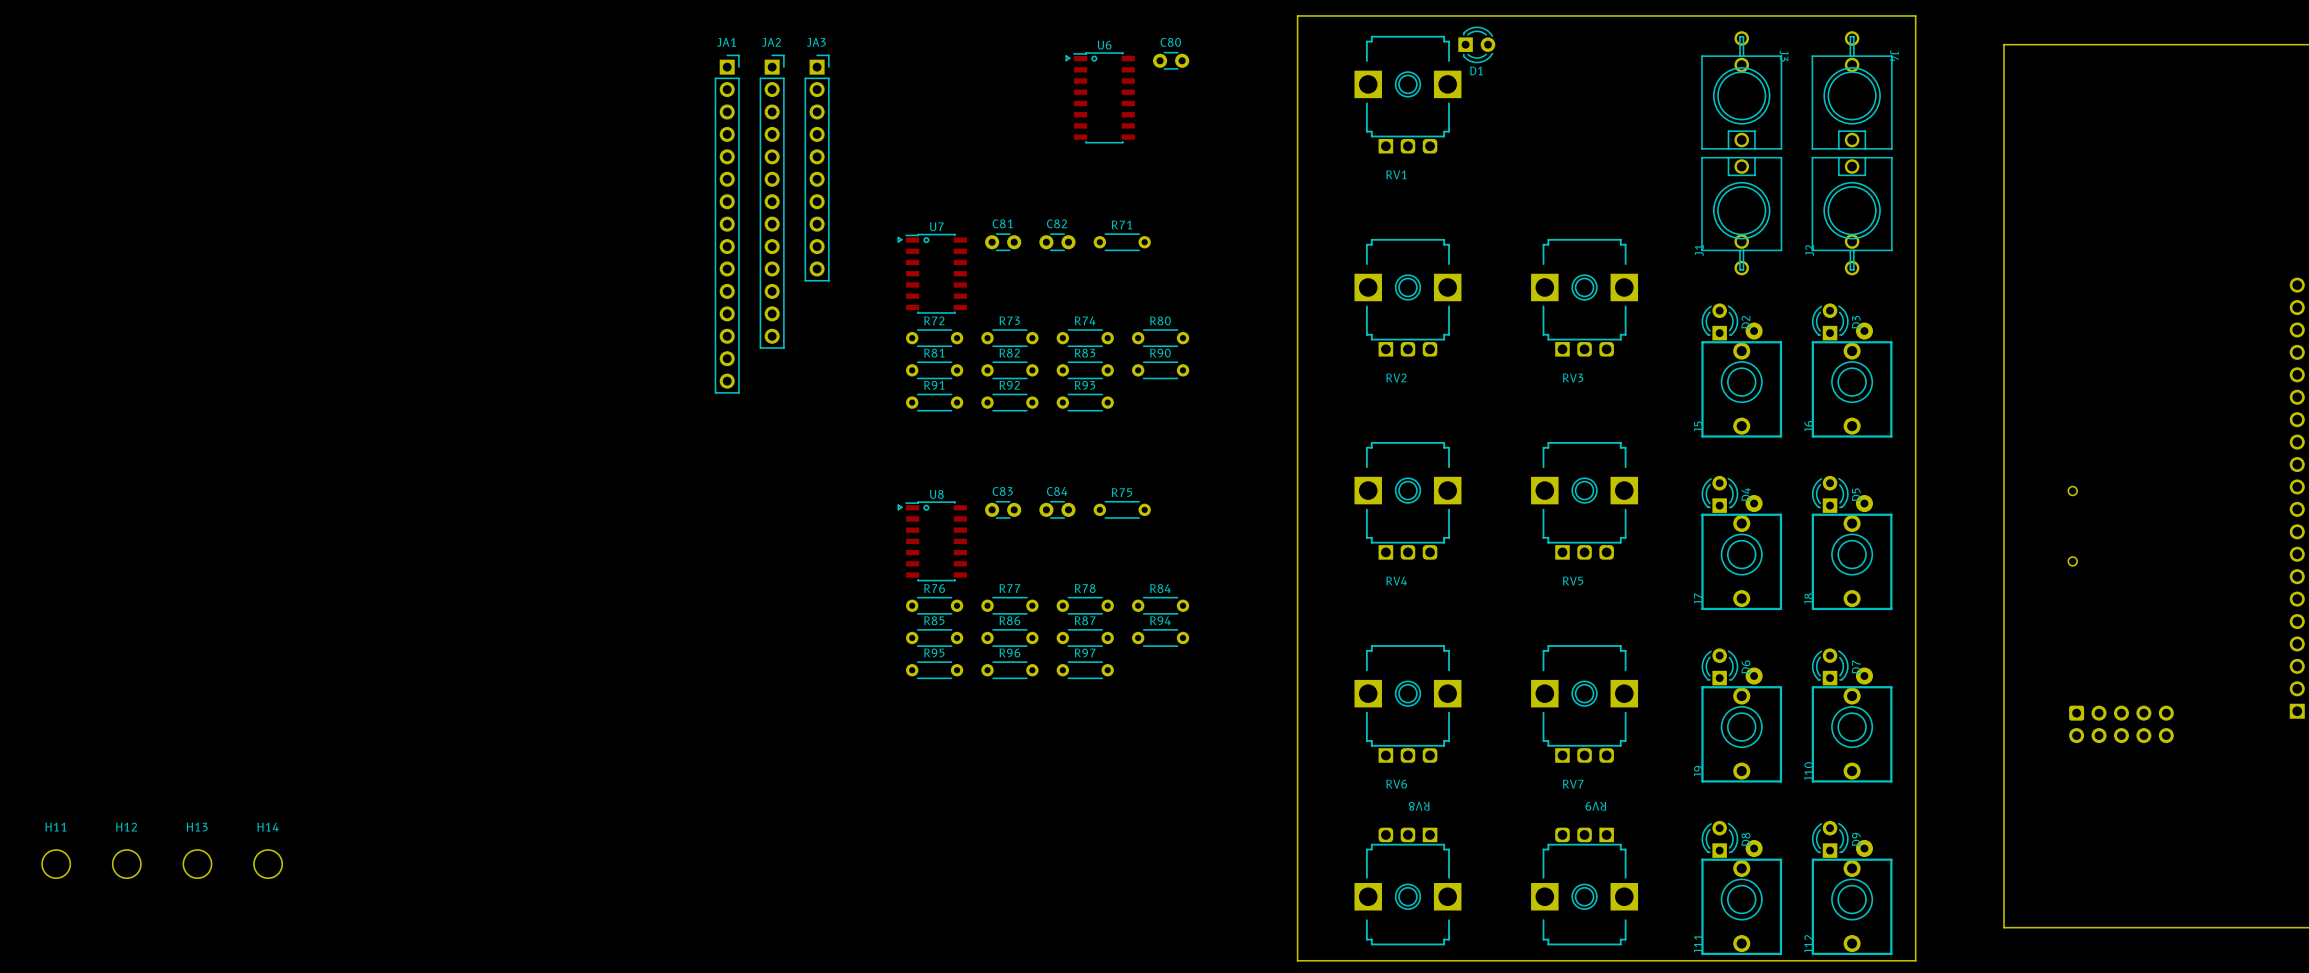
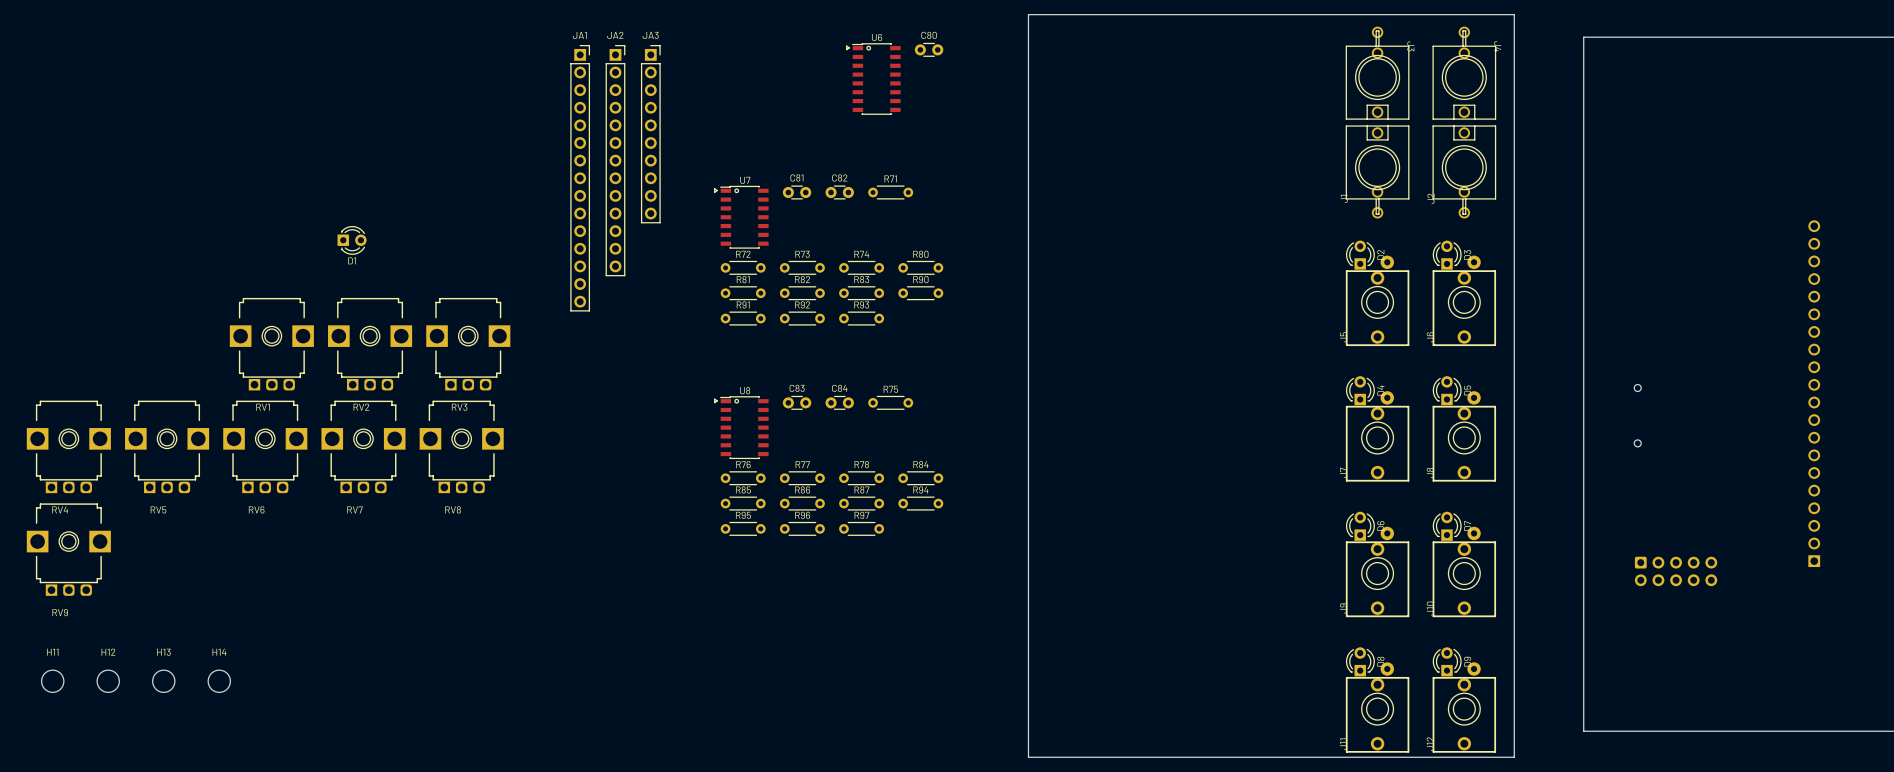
D1 position: (1476, 44) -> (352, 240)
RV1 position: (1407, 94) -> (271, 344)
RV2 position: (1407, 297) -> (370, 344)
RV3 position: (1584, 297) -> (468, 344)
RV4 position: (1407, 500) -> (68, 446)
RV5 position: (1584, 500) -> (167, 446)
RV6 position: (1407, 703) -> (265, 446)
RV7 position: (1584, 703) -> (363, 446)
RV8 rotation: 0° (1407, 886) -> 180° (461, 446)
RV8 position: (1407, 886) -> (461, 446)
RV9 rotation: 0° (1584, 886) -> 180° (68, 549)
RV9 position: (1584, 886) -> (68, 549)

